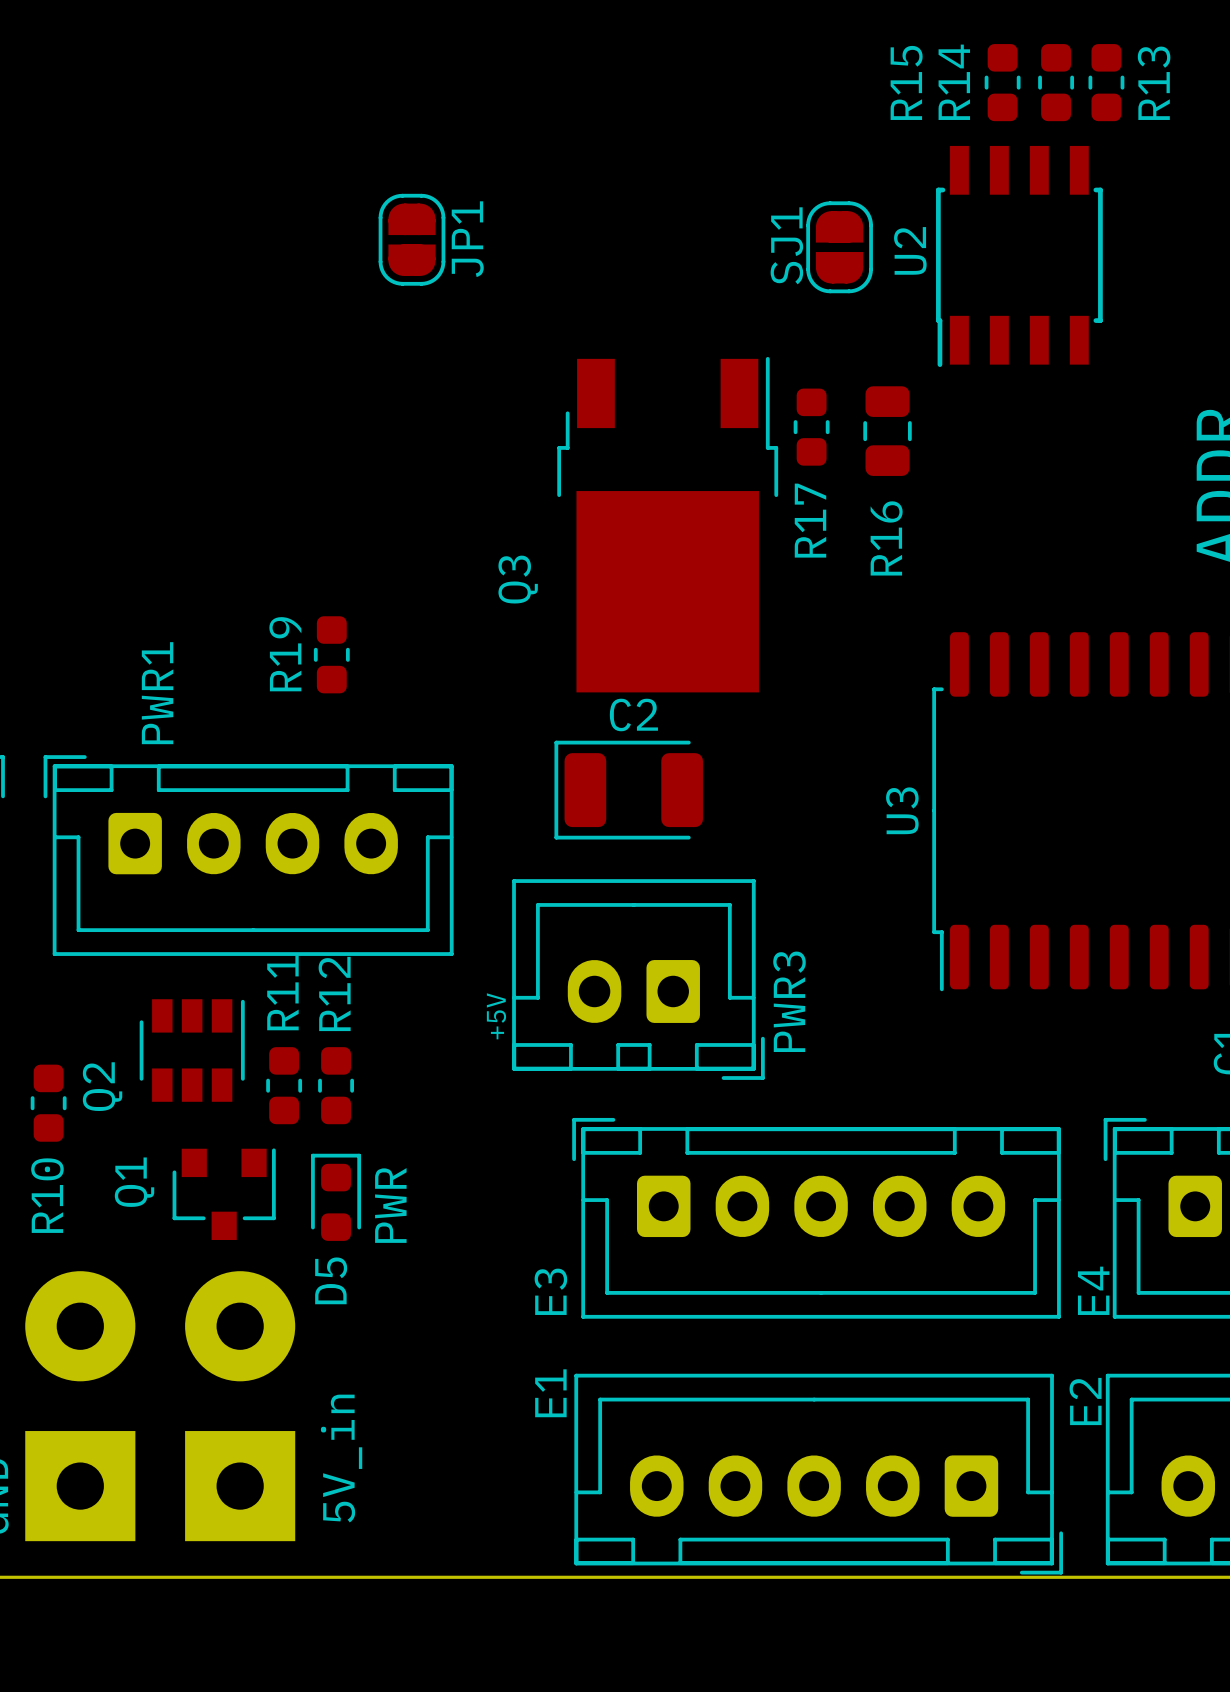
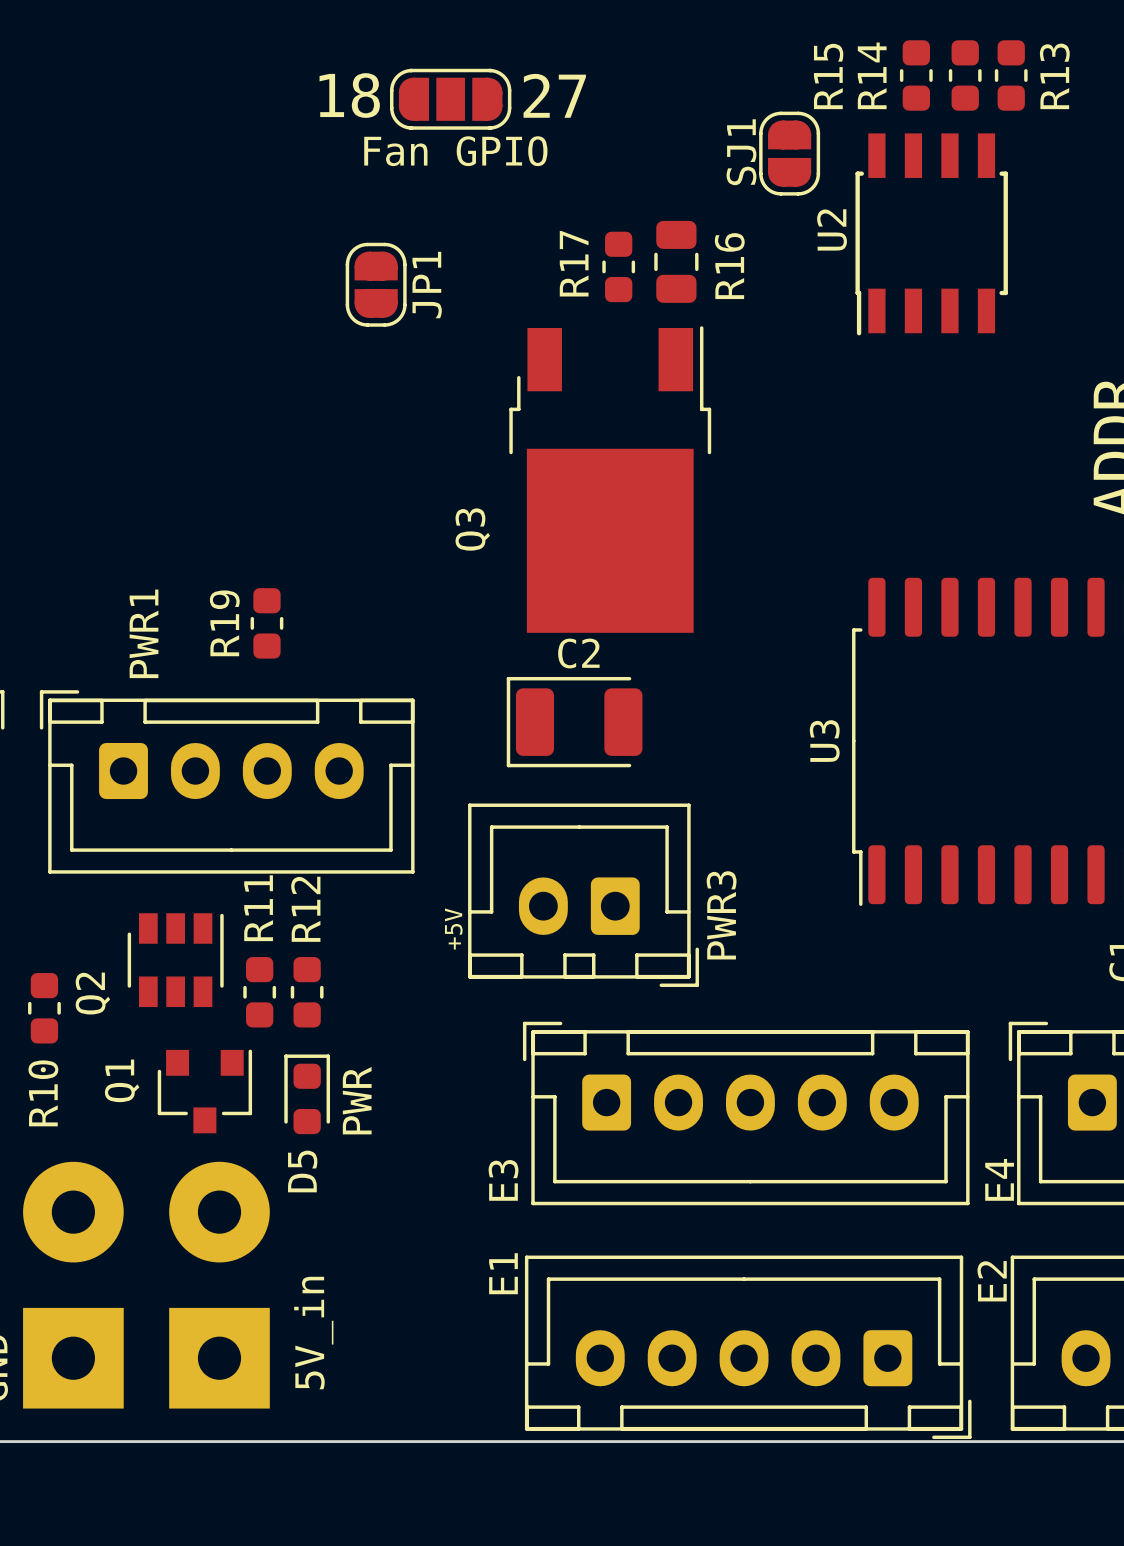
text: none -> 18 (349, 95)
text: none -> 27 (554, 95)
part: none -> (450, 99)
text: none -> Fan GPIO (455, 151)
JP1 position: (411, 239) -> (376, 284)
SJ1 position: (839, 247) -> (789, 153)
R17 position: (811, 427) -> (618, 266)
R16 position: (887, 431) -> (676, 261)
R17 name position: R17 (810, 520) -> R17 (574, 263)
R16 name position: R16 (886, 538) -> R16 (729, 266)
R19 position: (331, 654) -> (266, 623)

